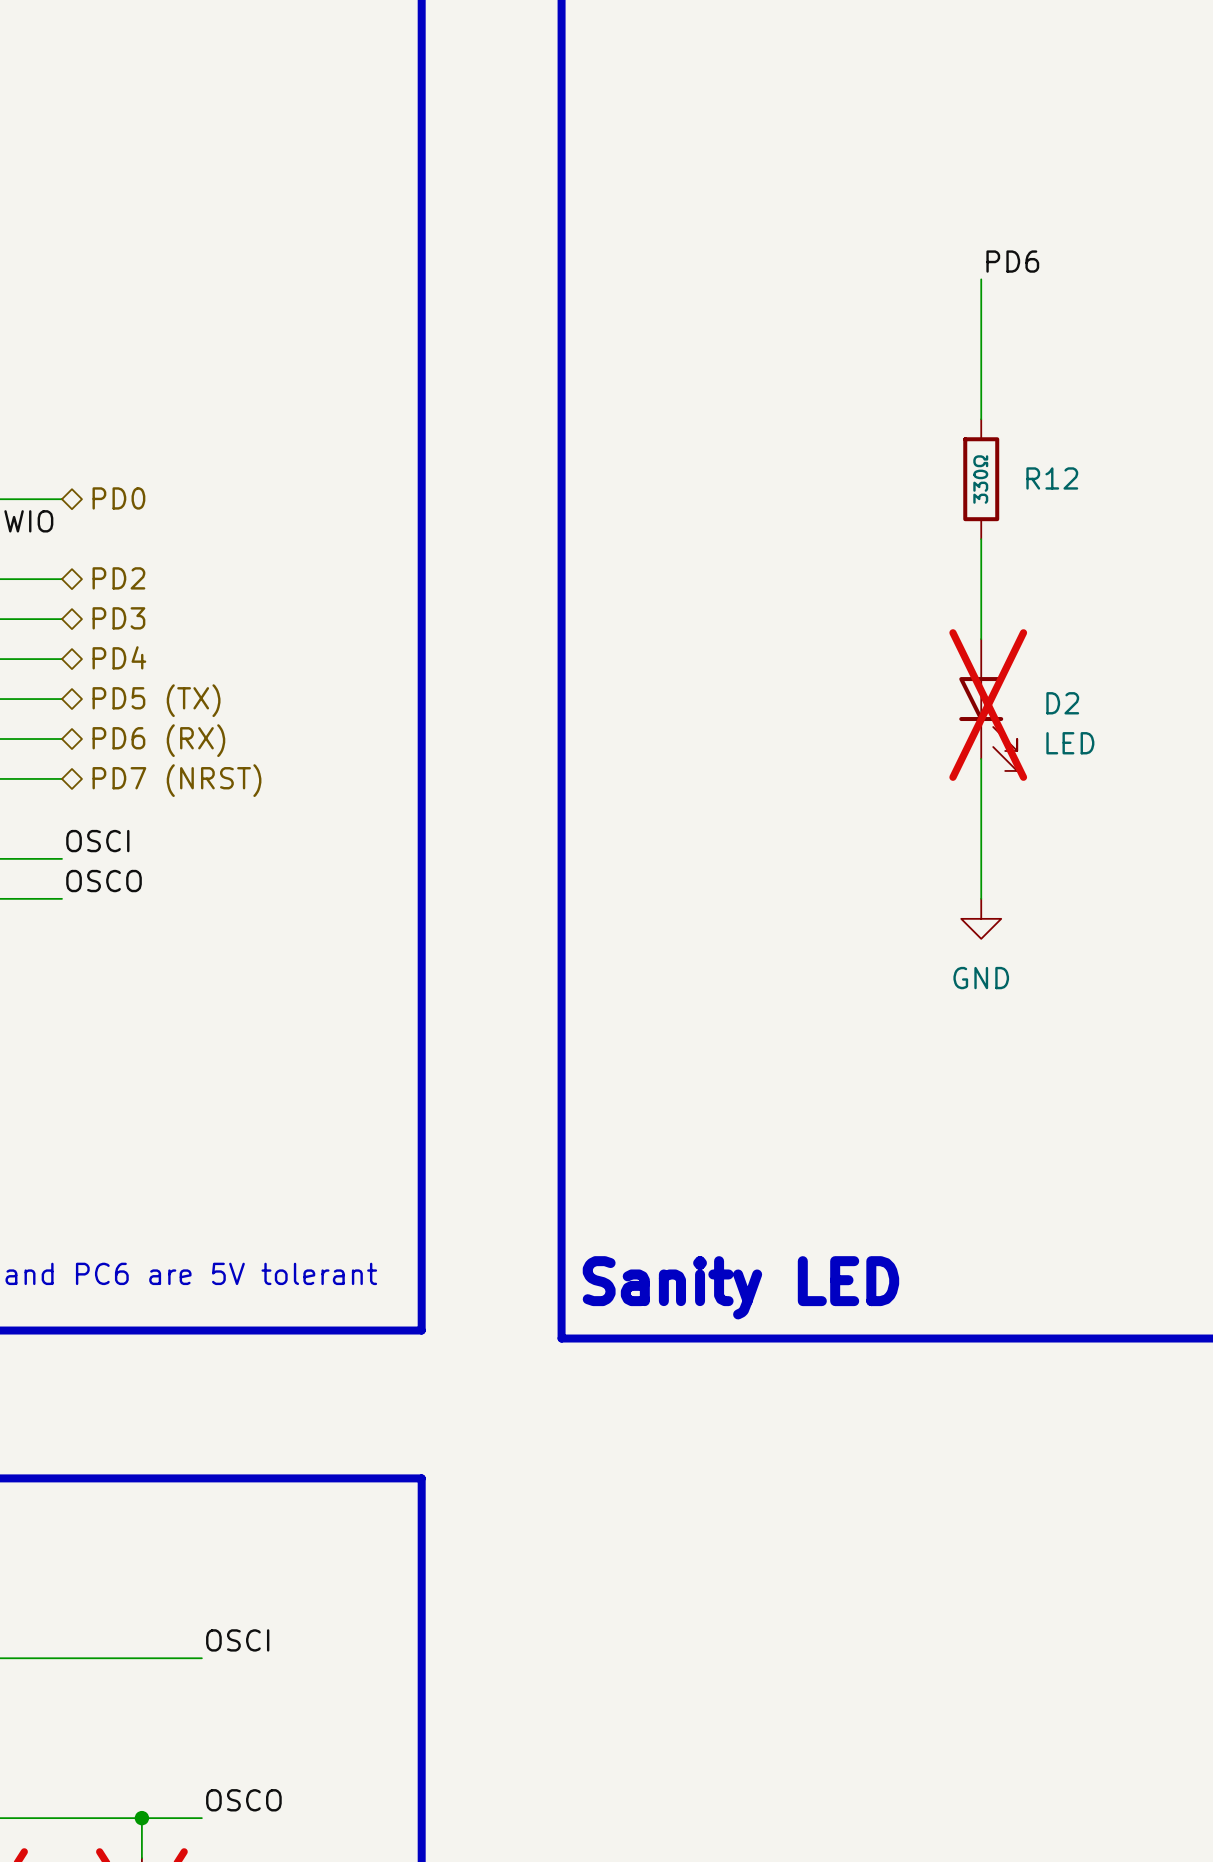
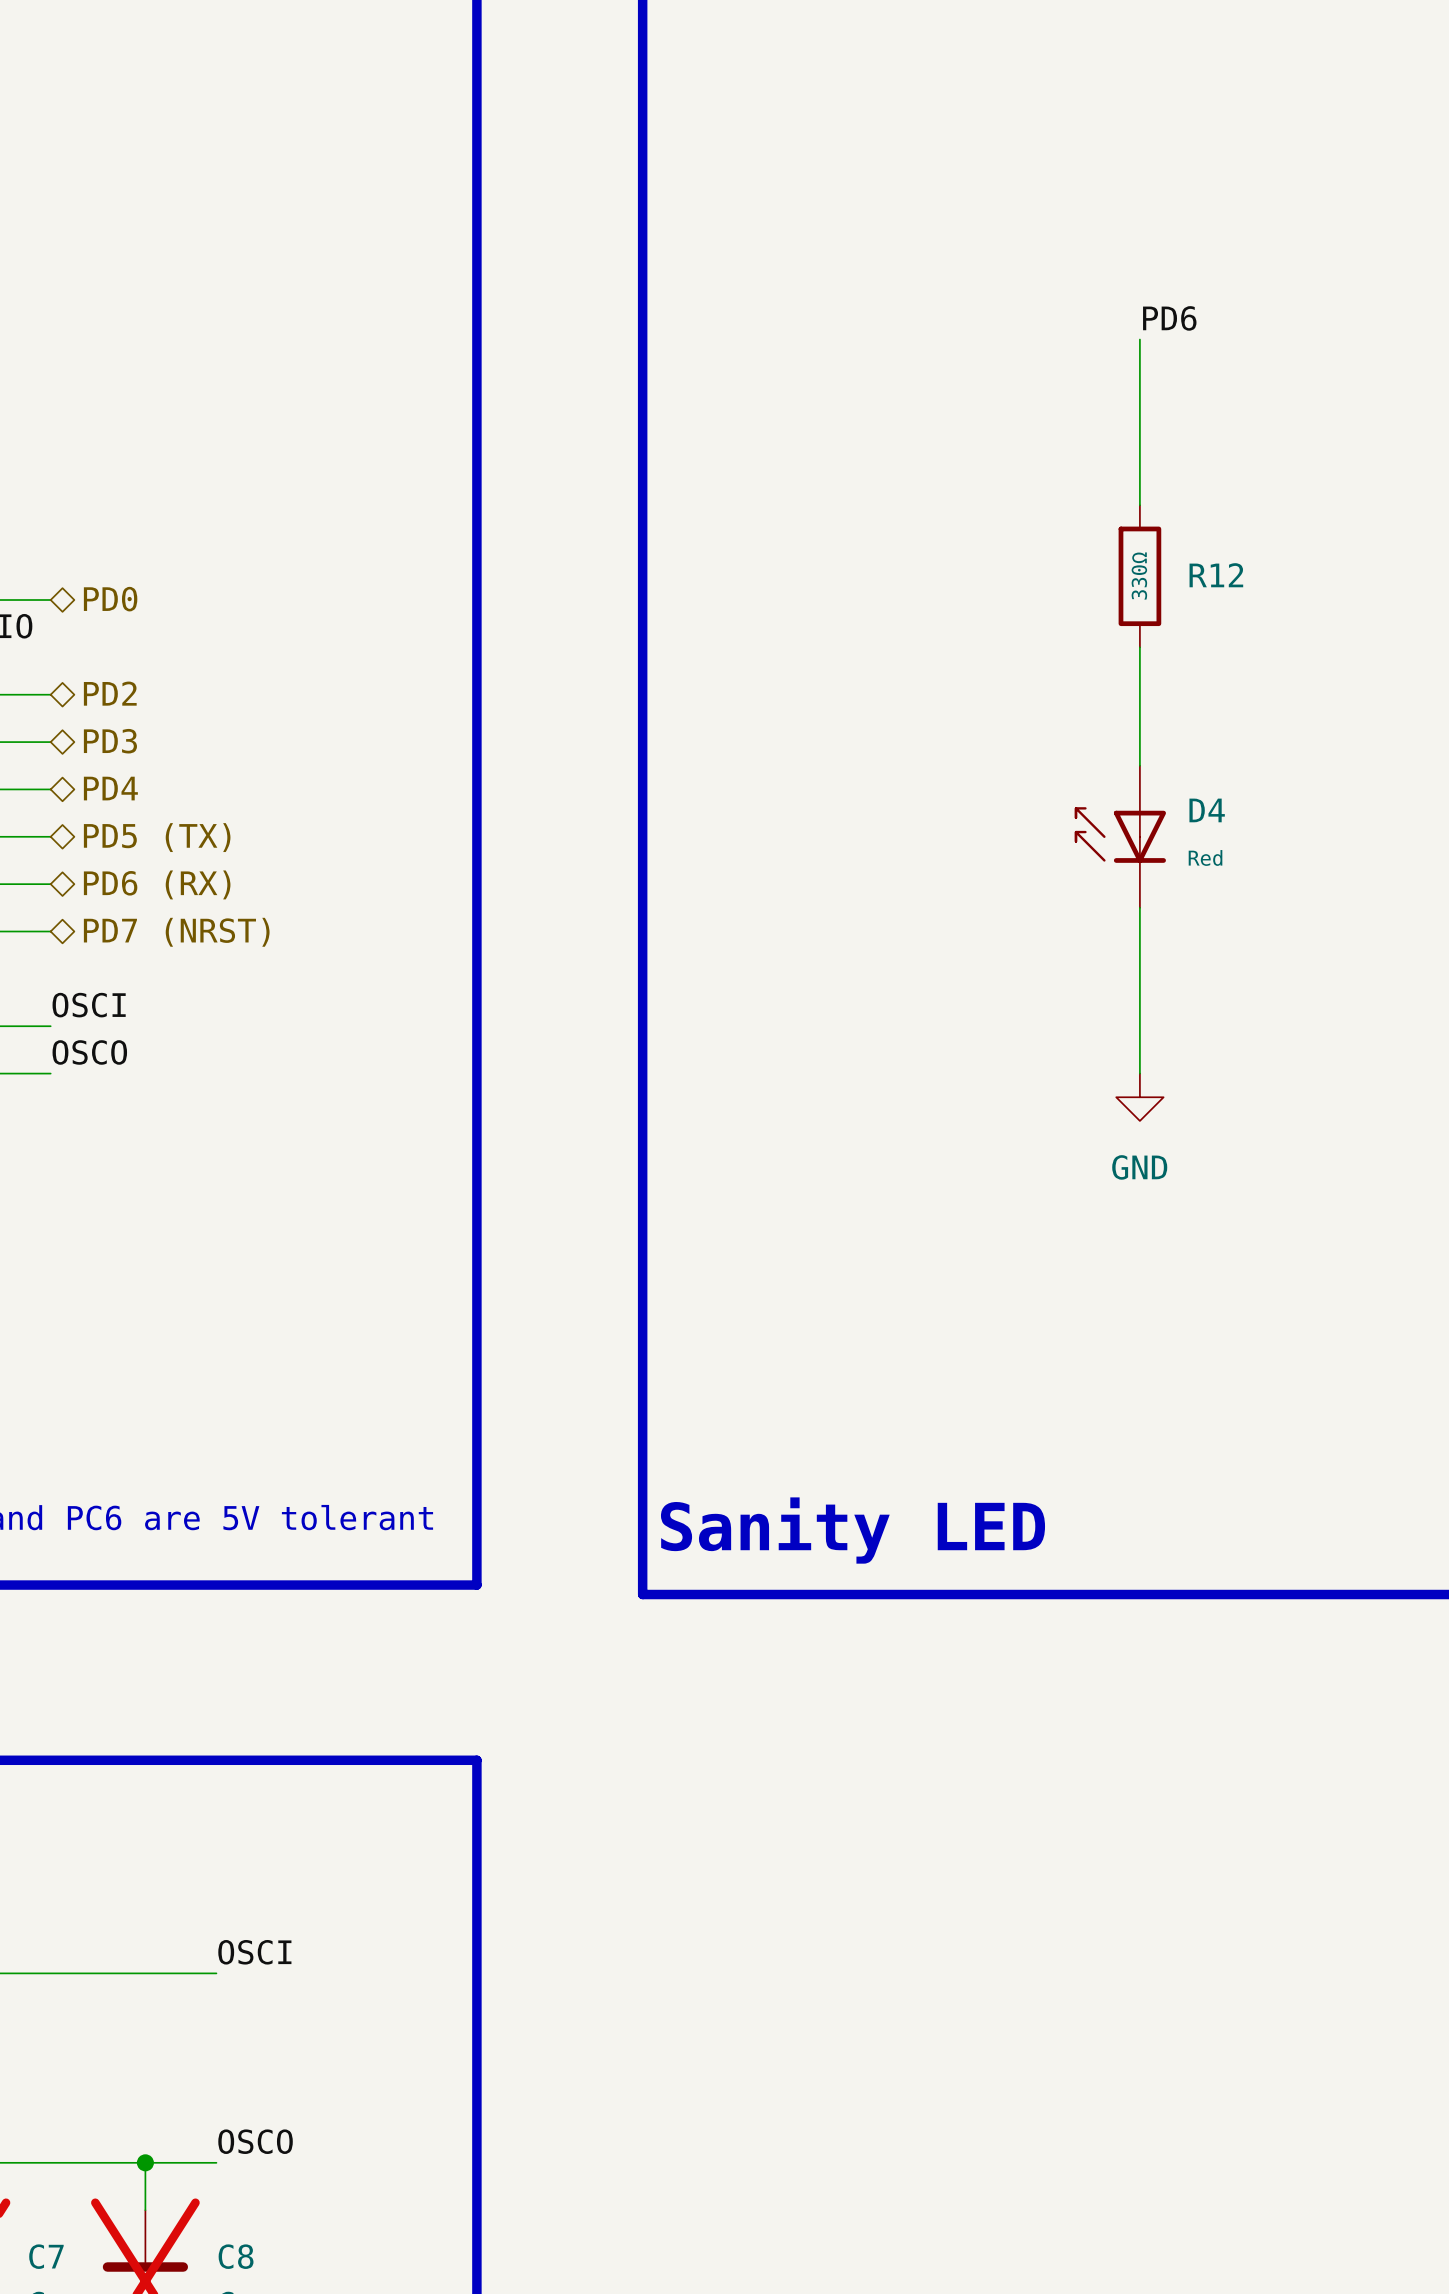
D4: none -> Red (1120, 836)
D2: LED (988, 705) -> none

